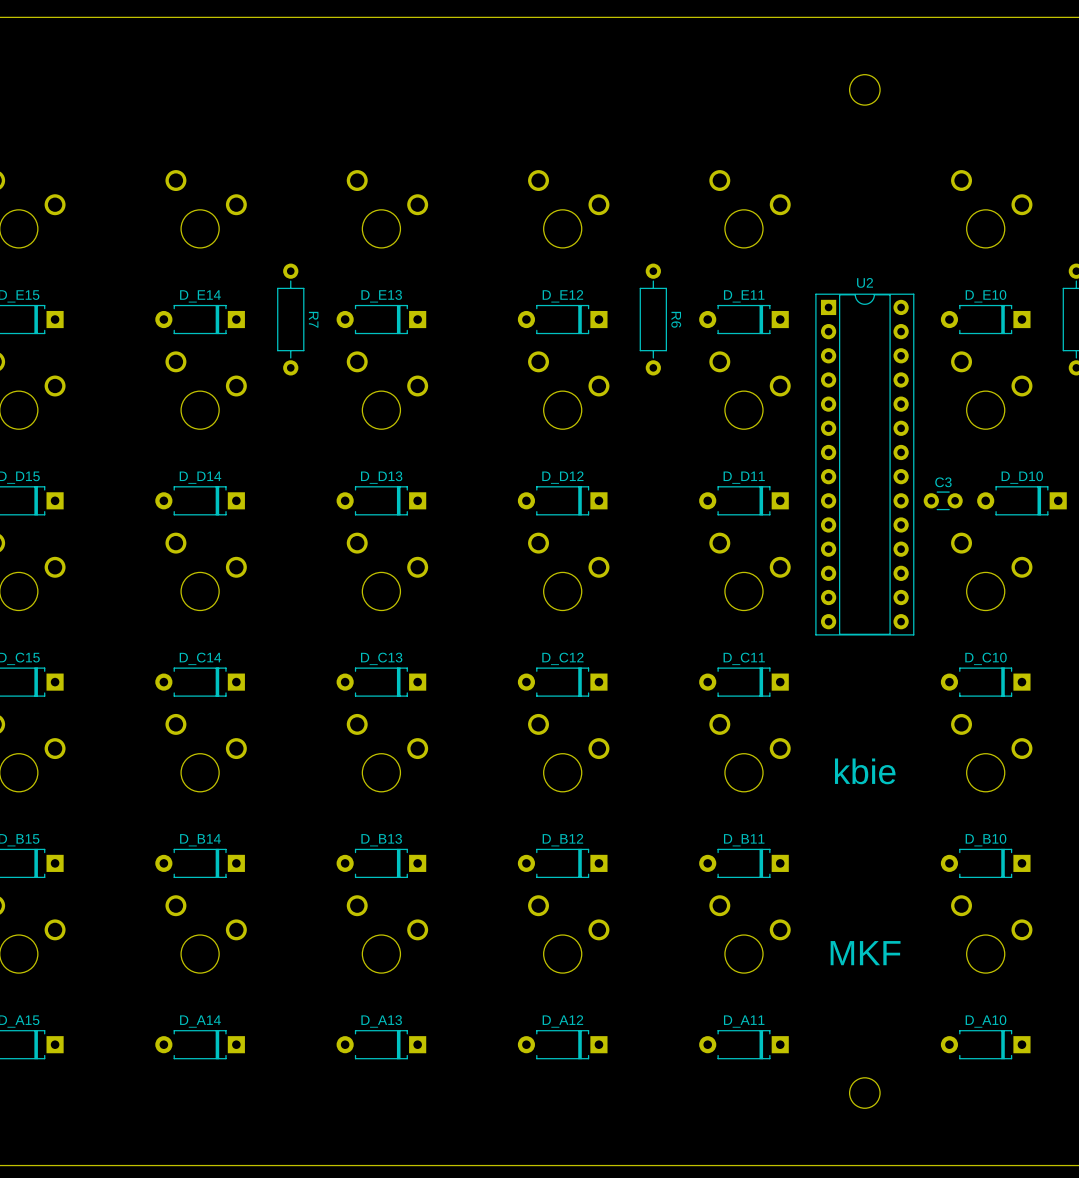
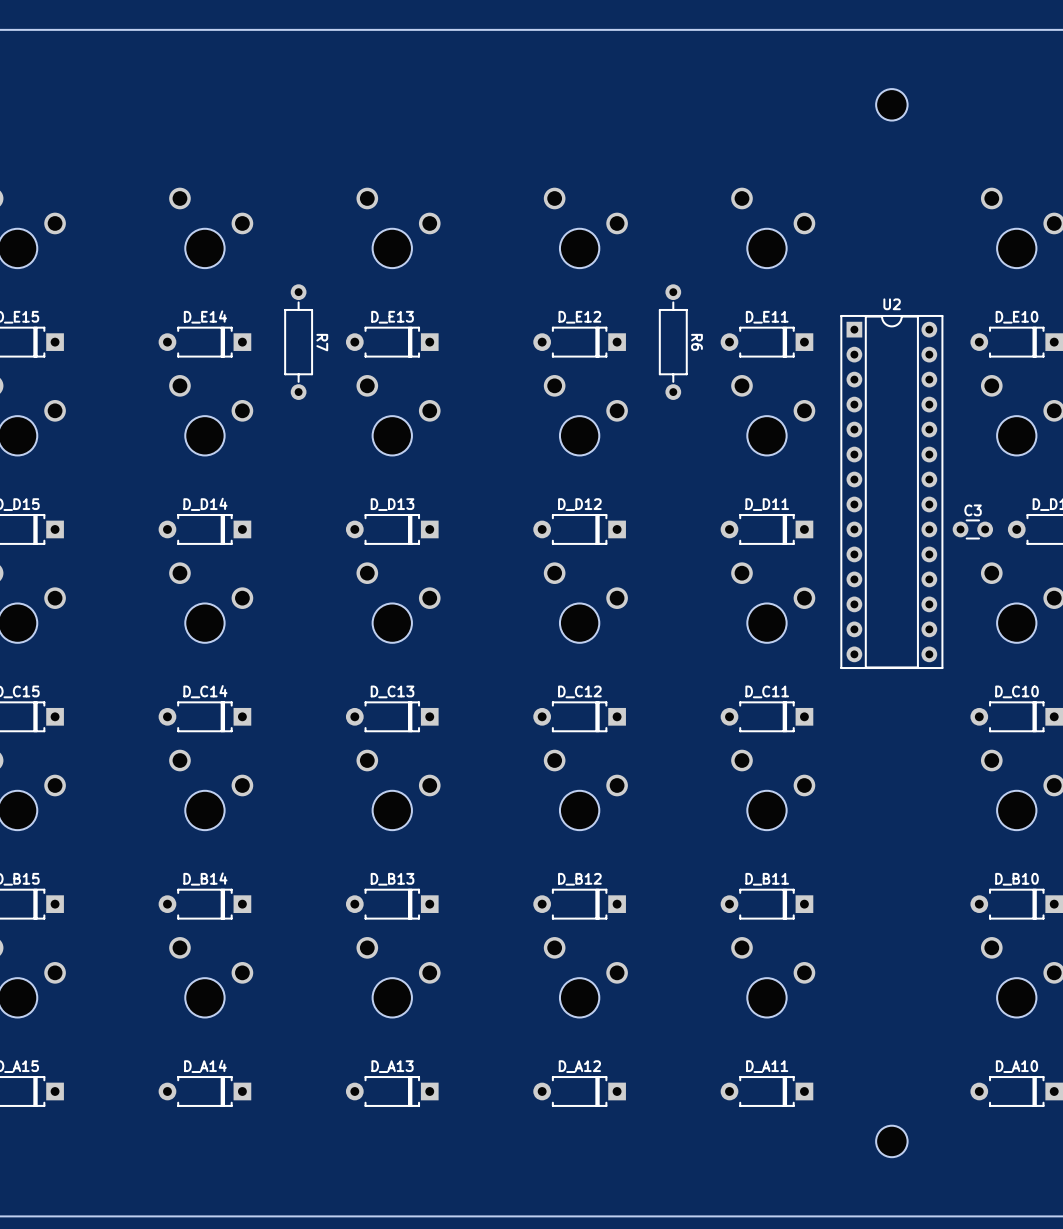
text: kbie (865, 771) -> none
text: MKF (865, 953) -> none

